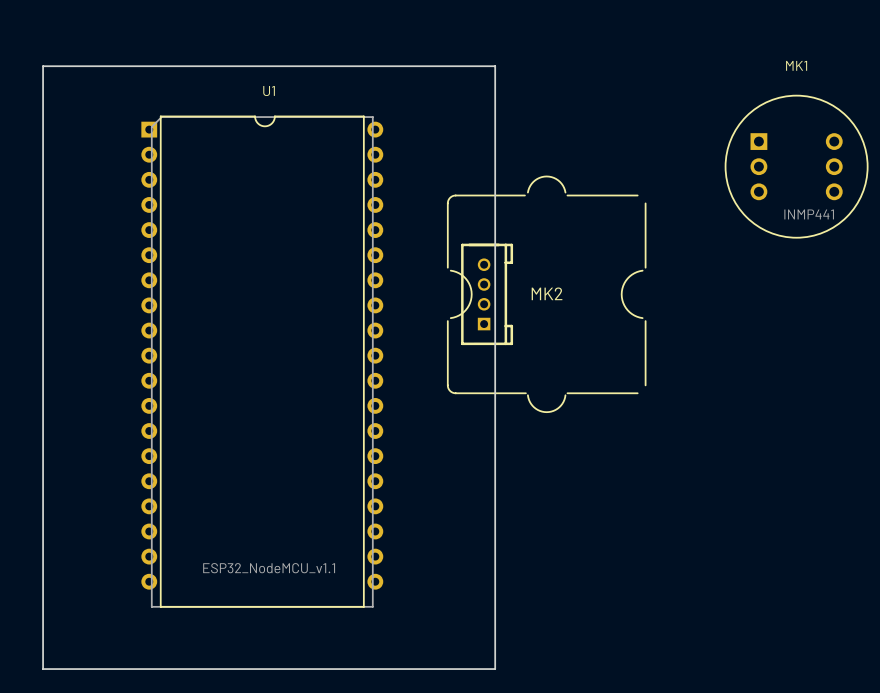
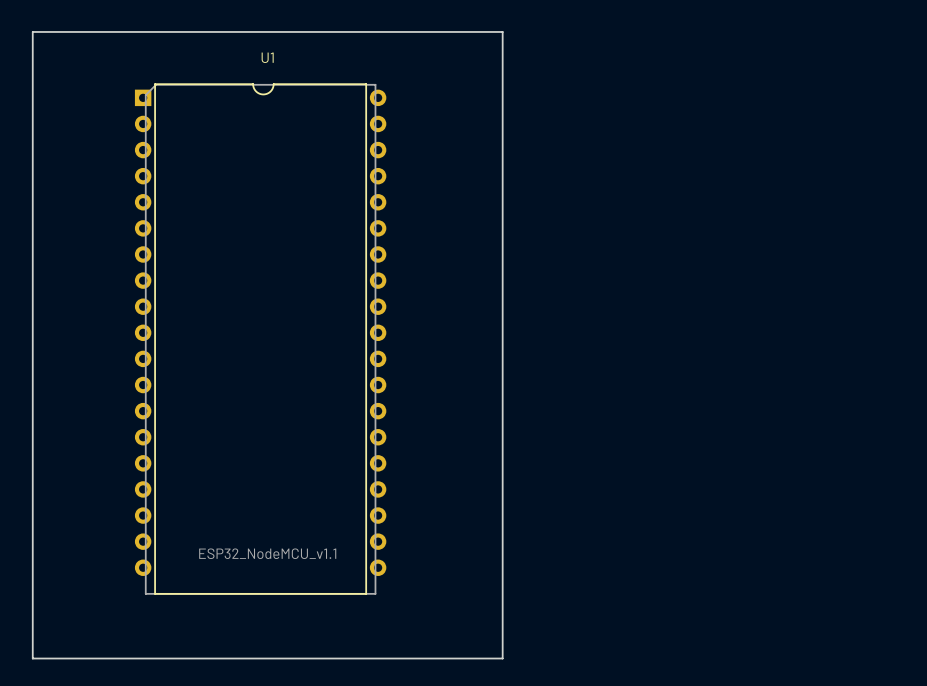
MK1: INMP441 (796, 166) -> none
MK2: (546, 294) -> none

